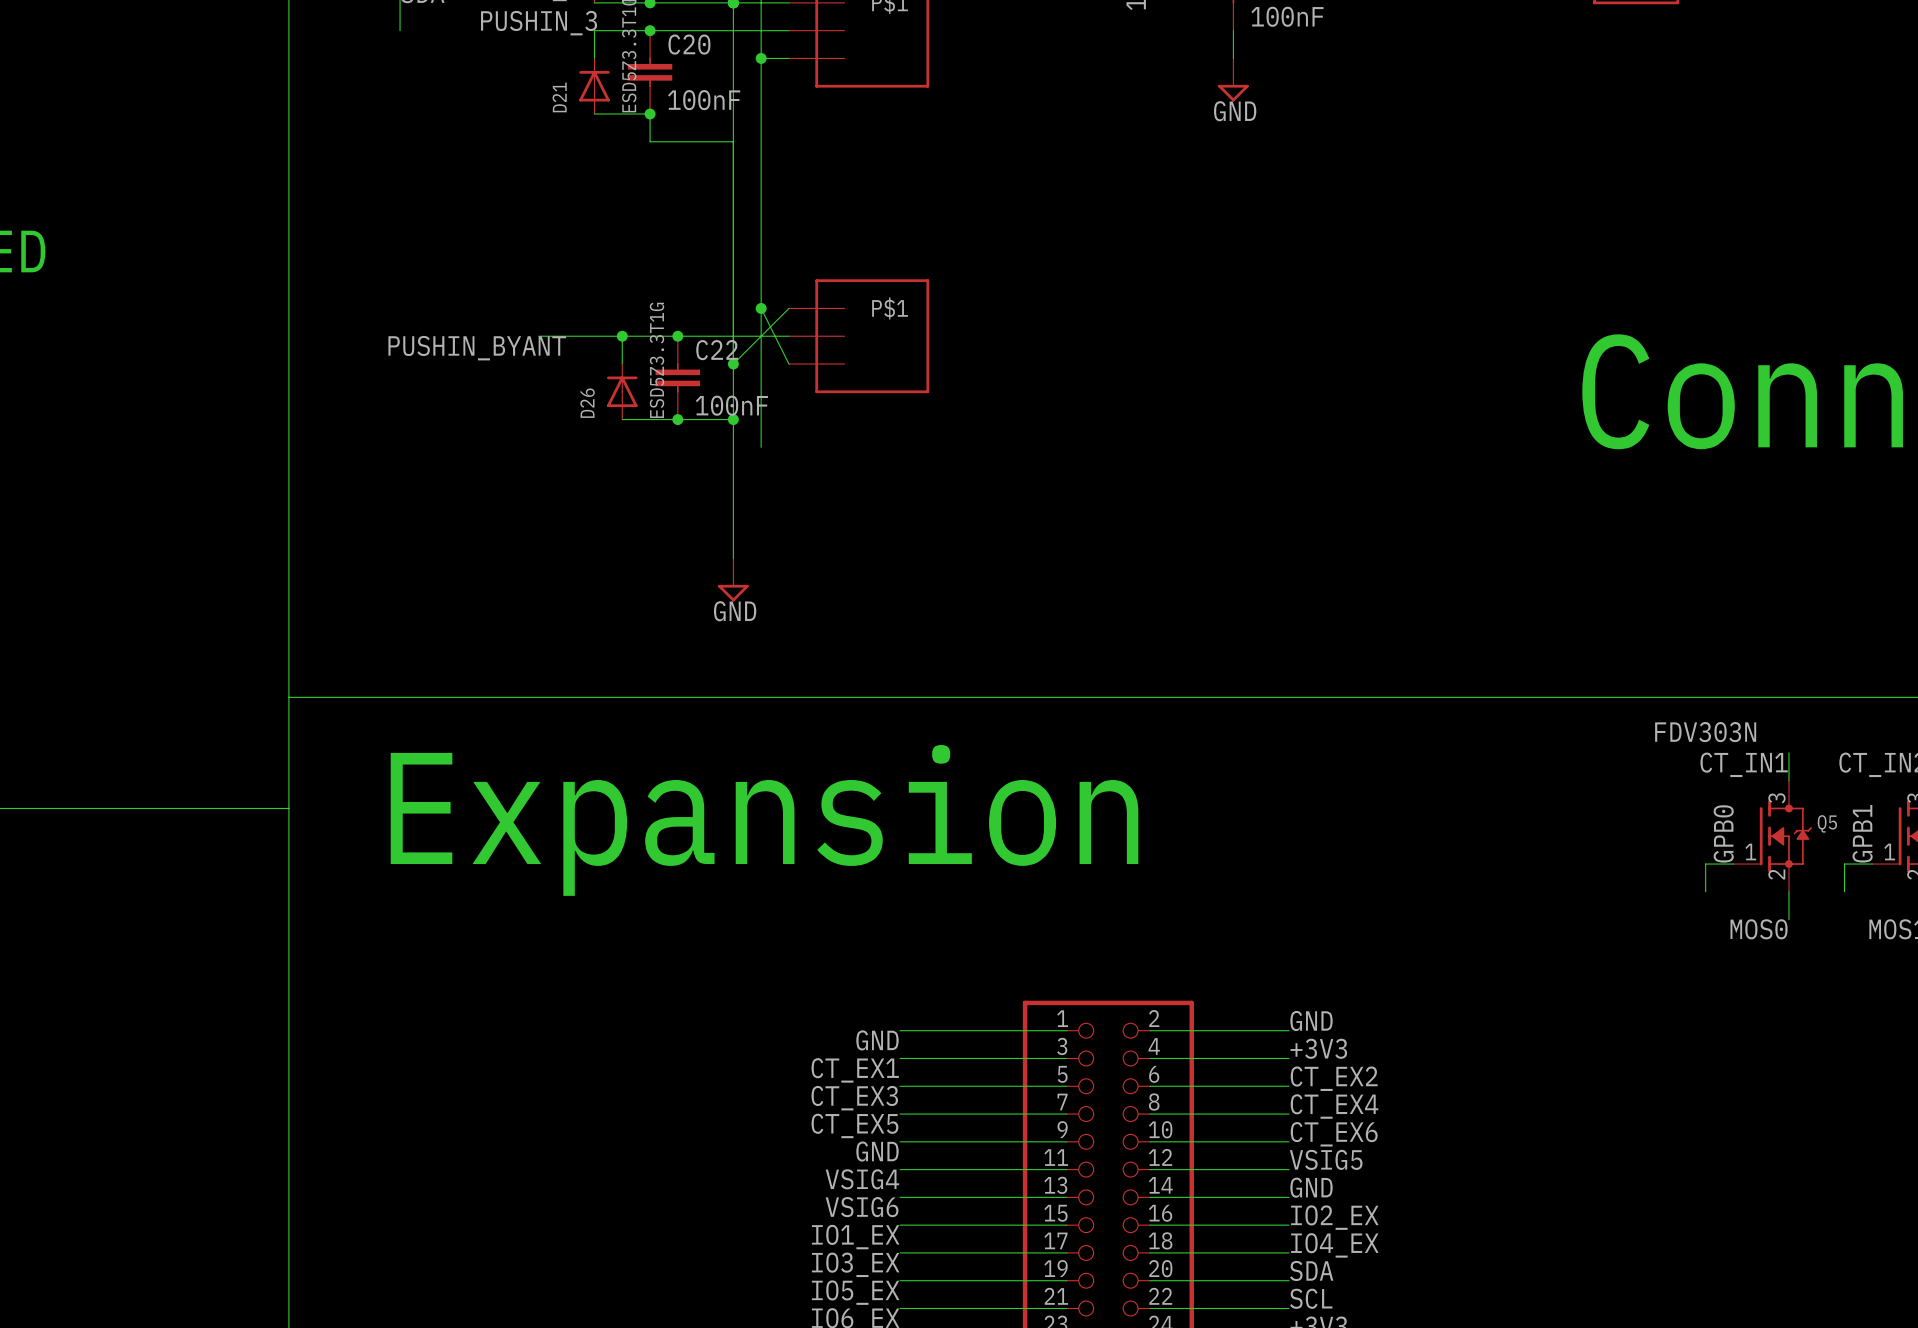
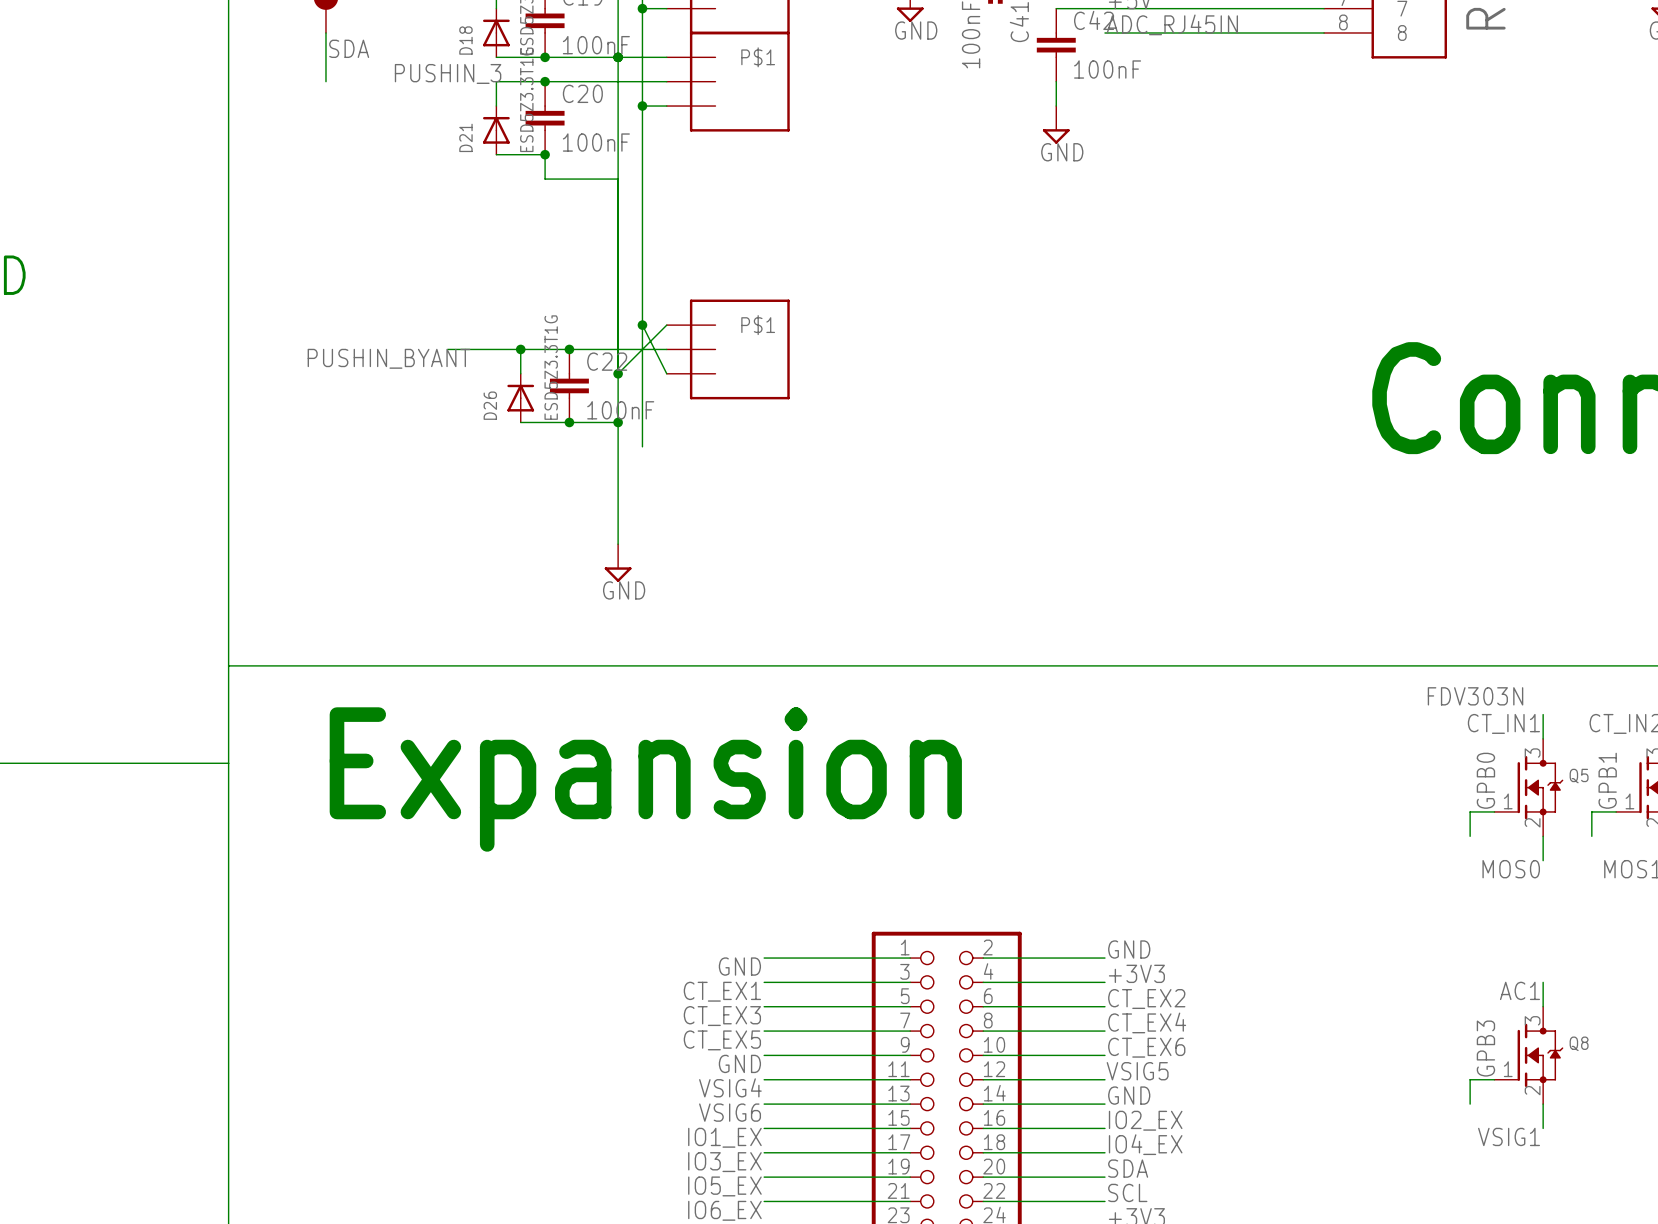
wire: none -> (1543, 982) (1543, 1006)
label: none -> AC1 (1519, 990)
label: none -> GPB3 (1485, 1048)
Q8: none -> (1528, 1055)
wire: none -> (1494, 1079) (1470, 1079) (1470, 1104)
wire: none -> (1543, 1104) (1543, 1128)
label: none -> VSIG1 (1509, 1136)

